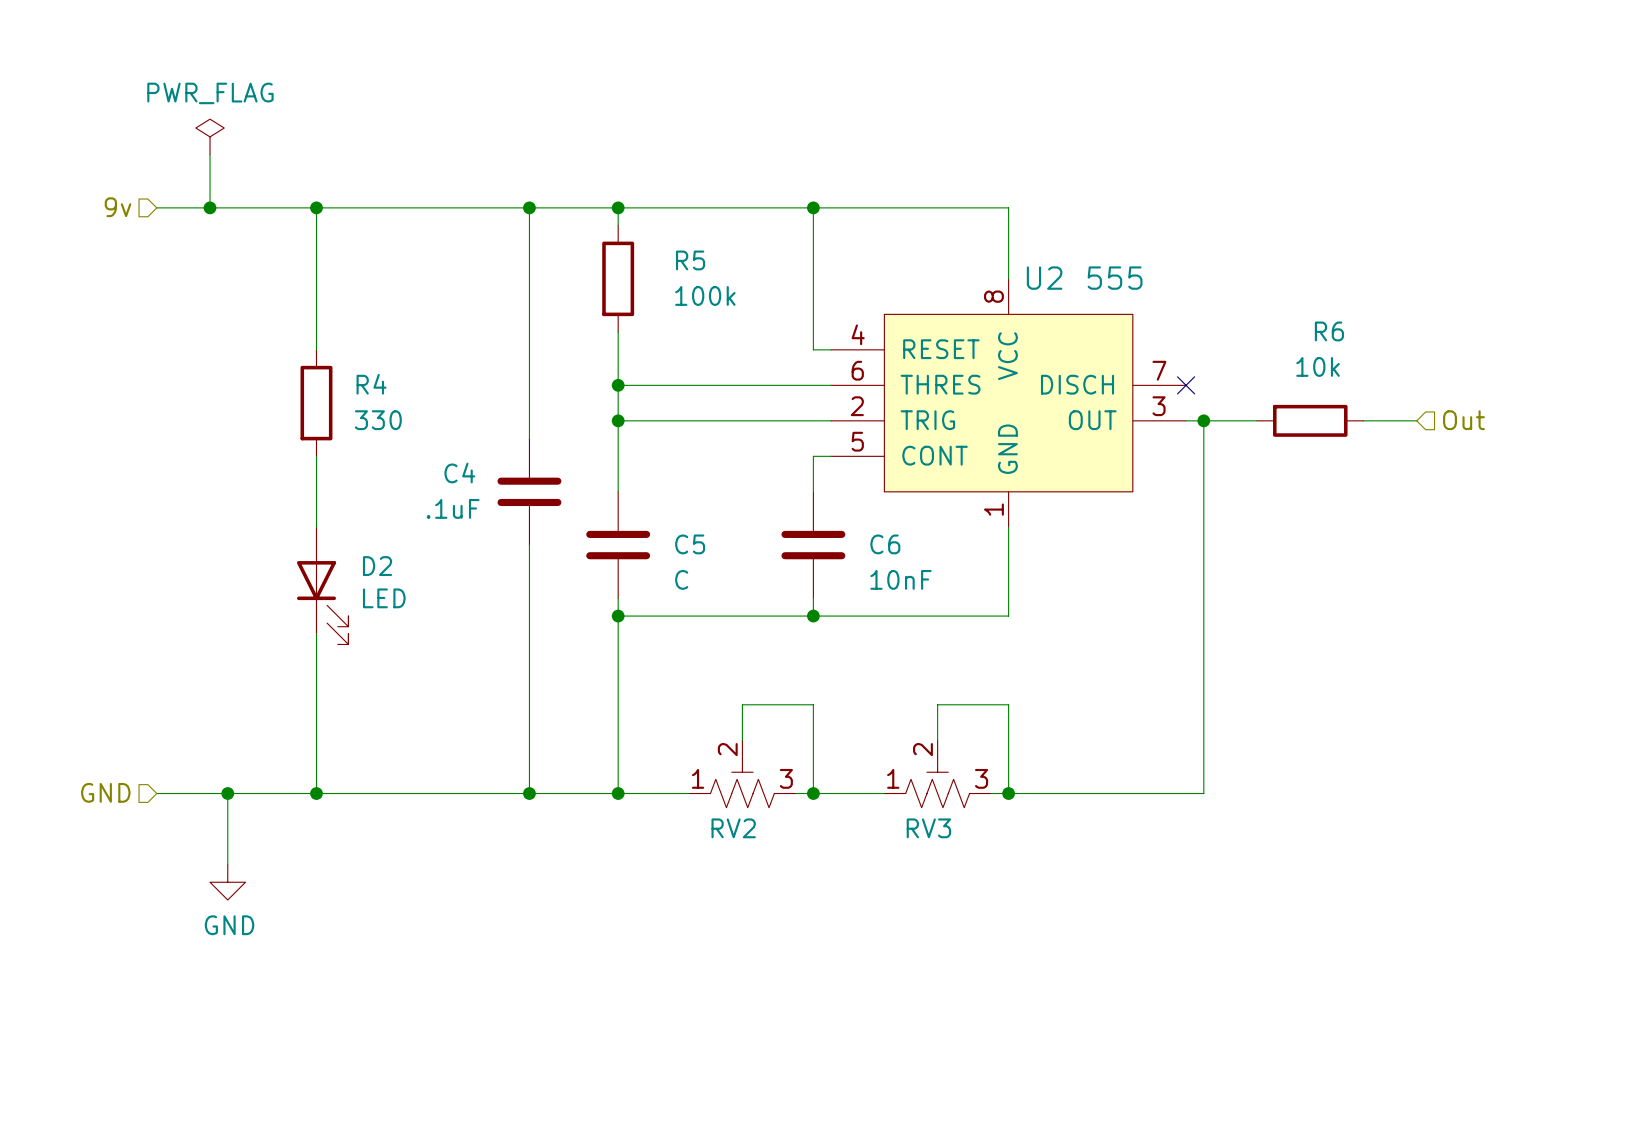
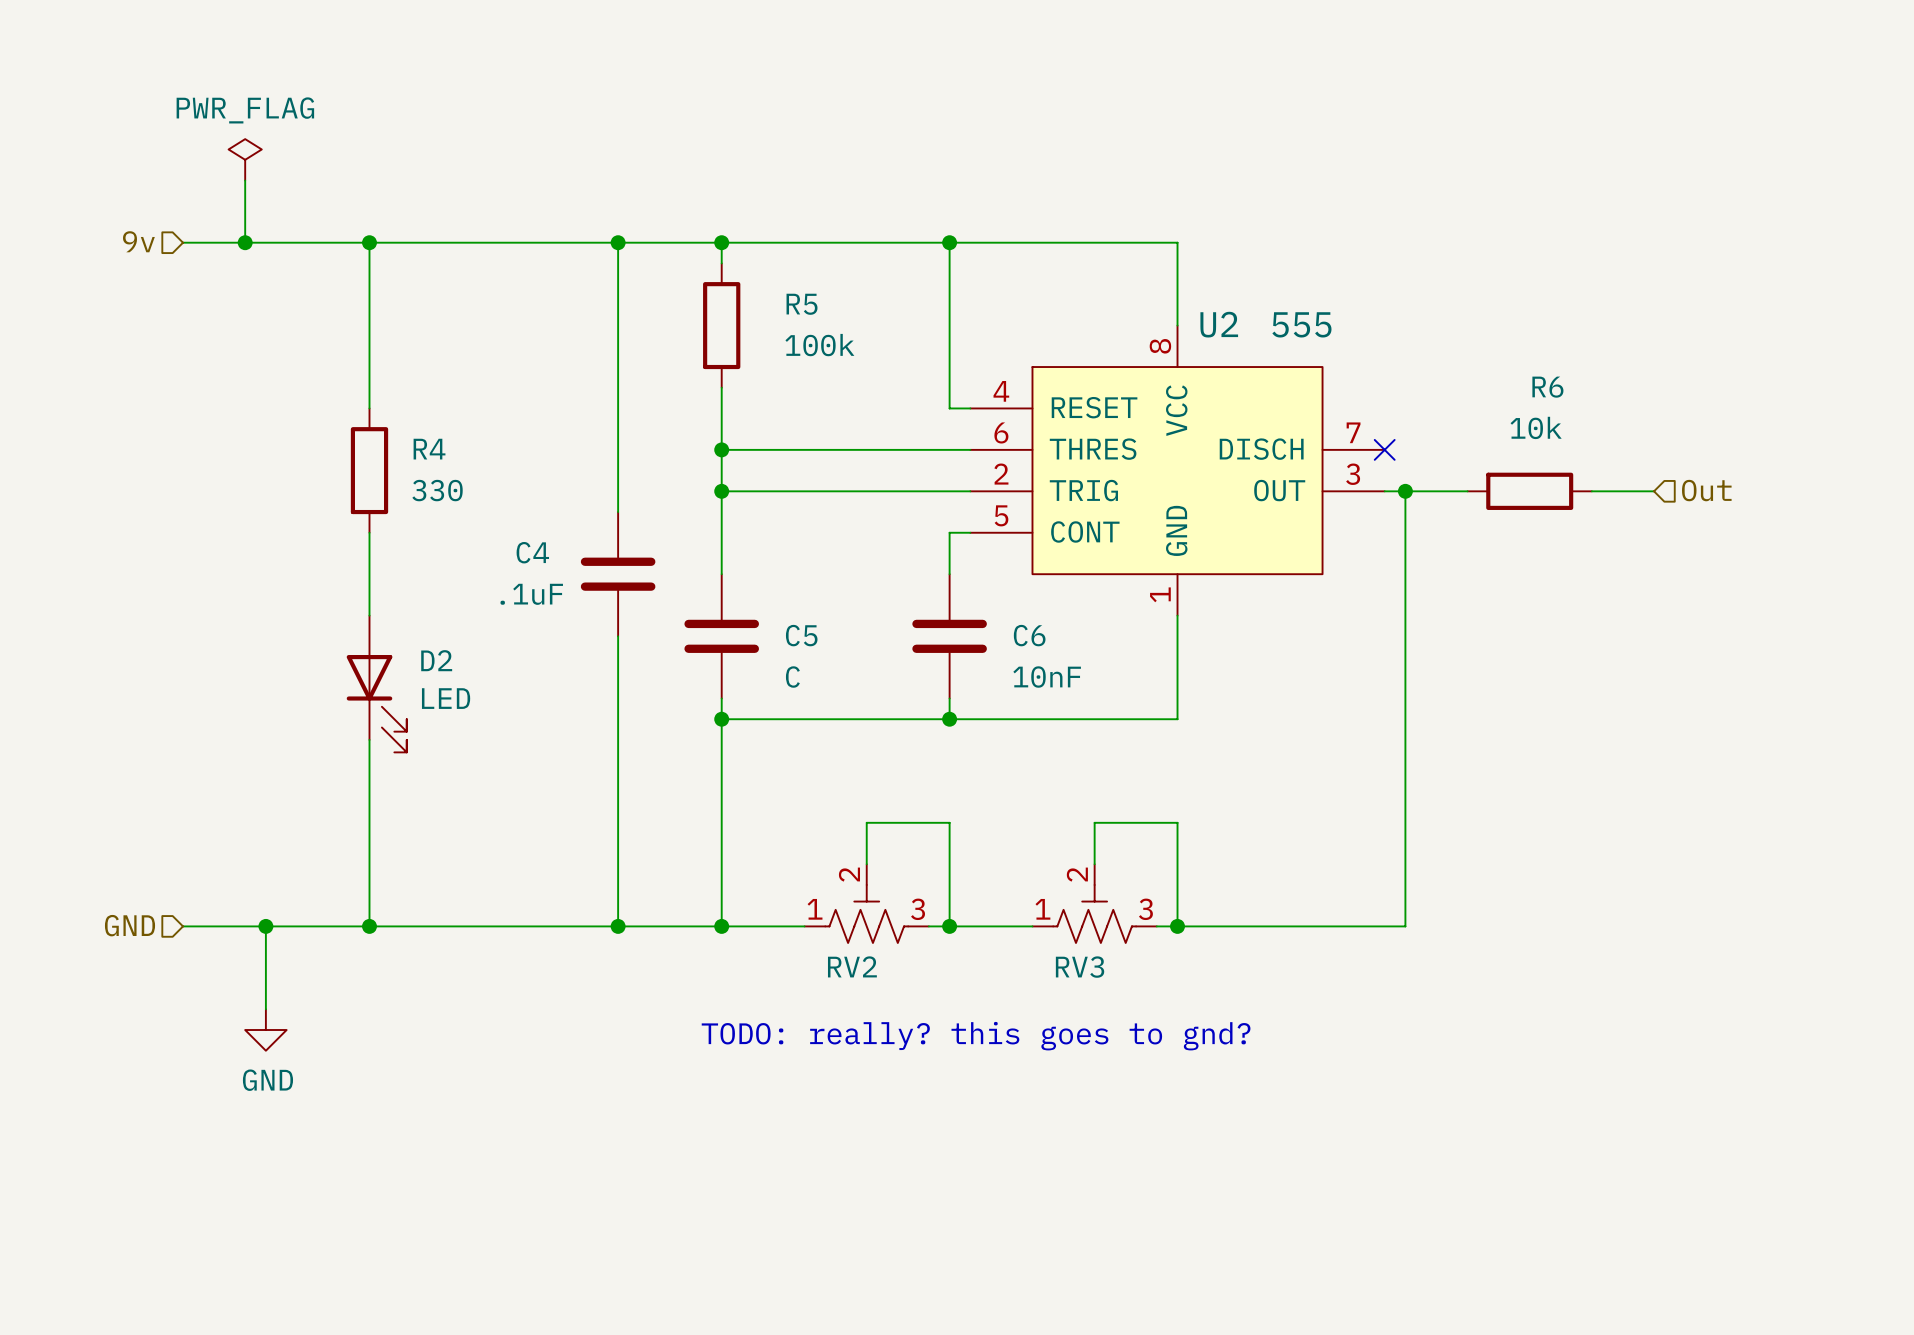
text: none -> TODO: really? this goes to gnd? (976, 1036)

